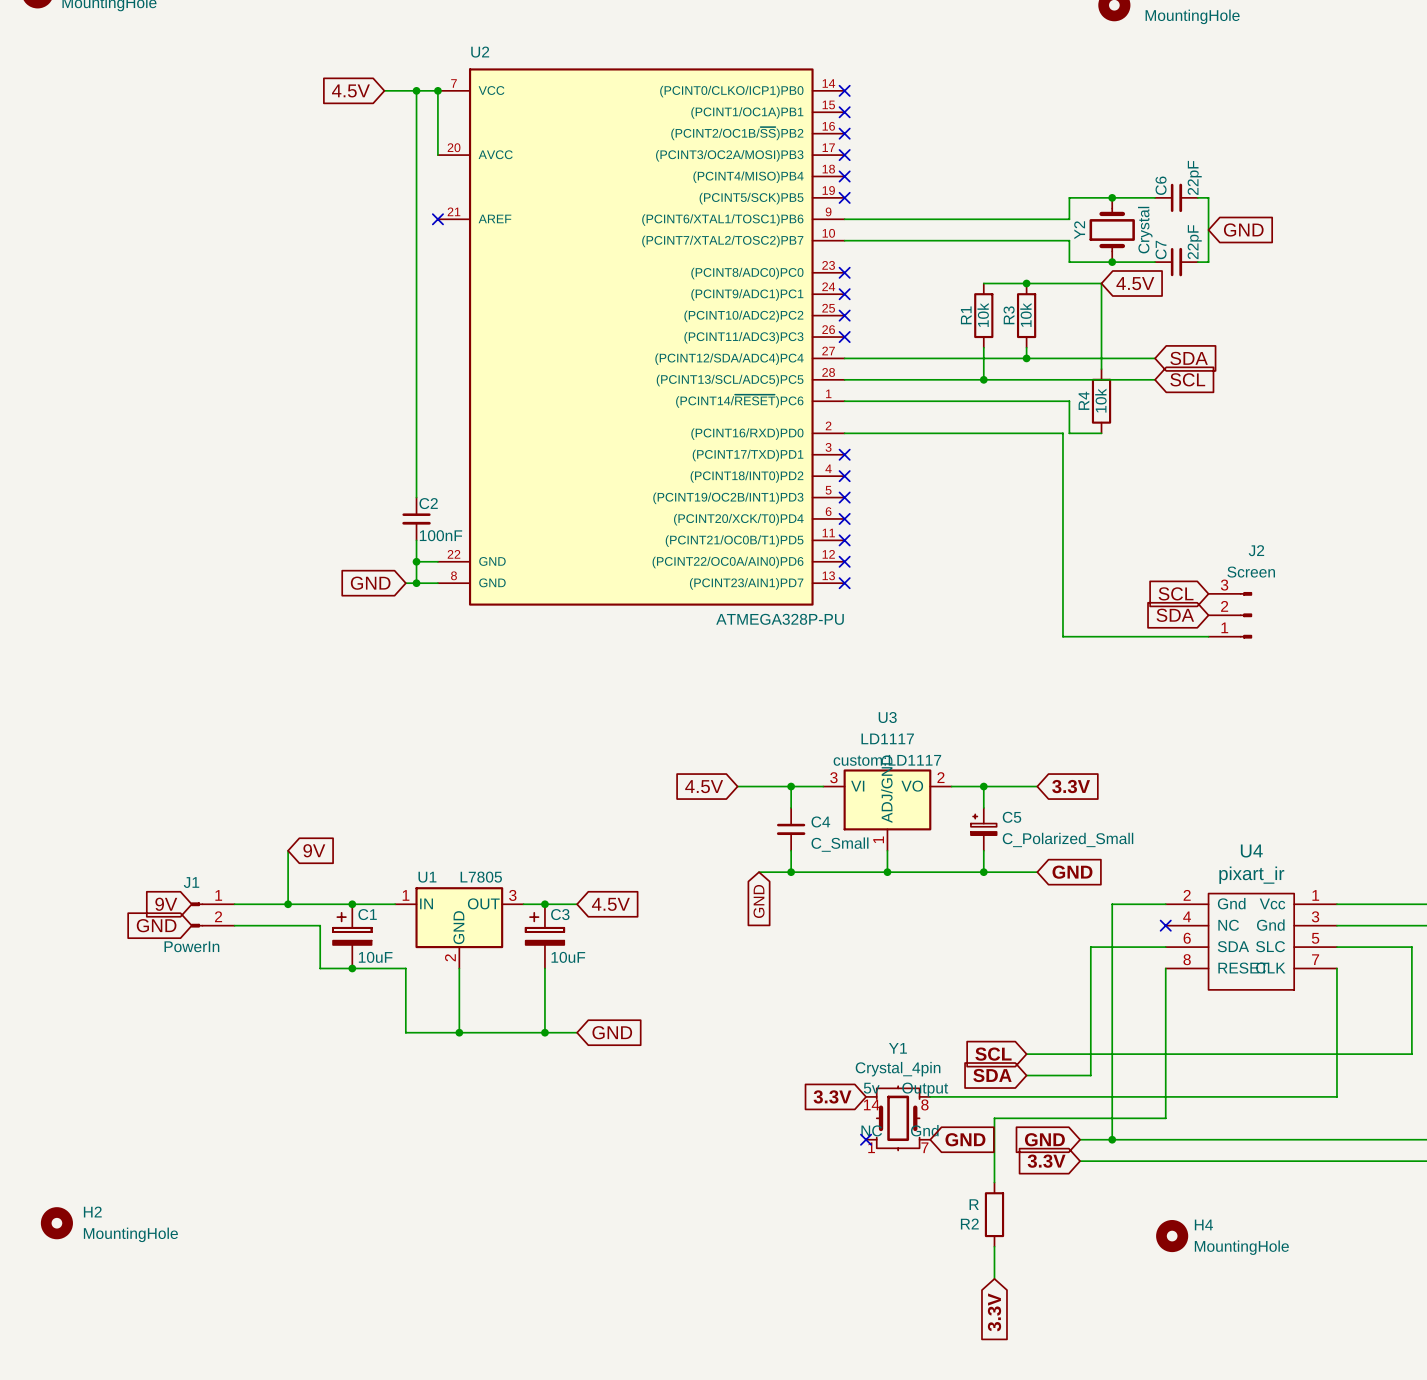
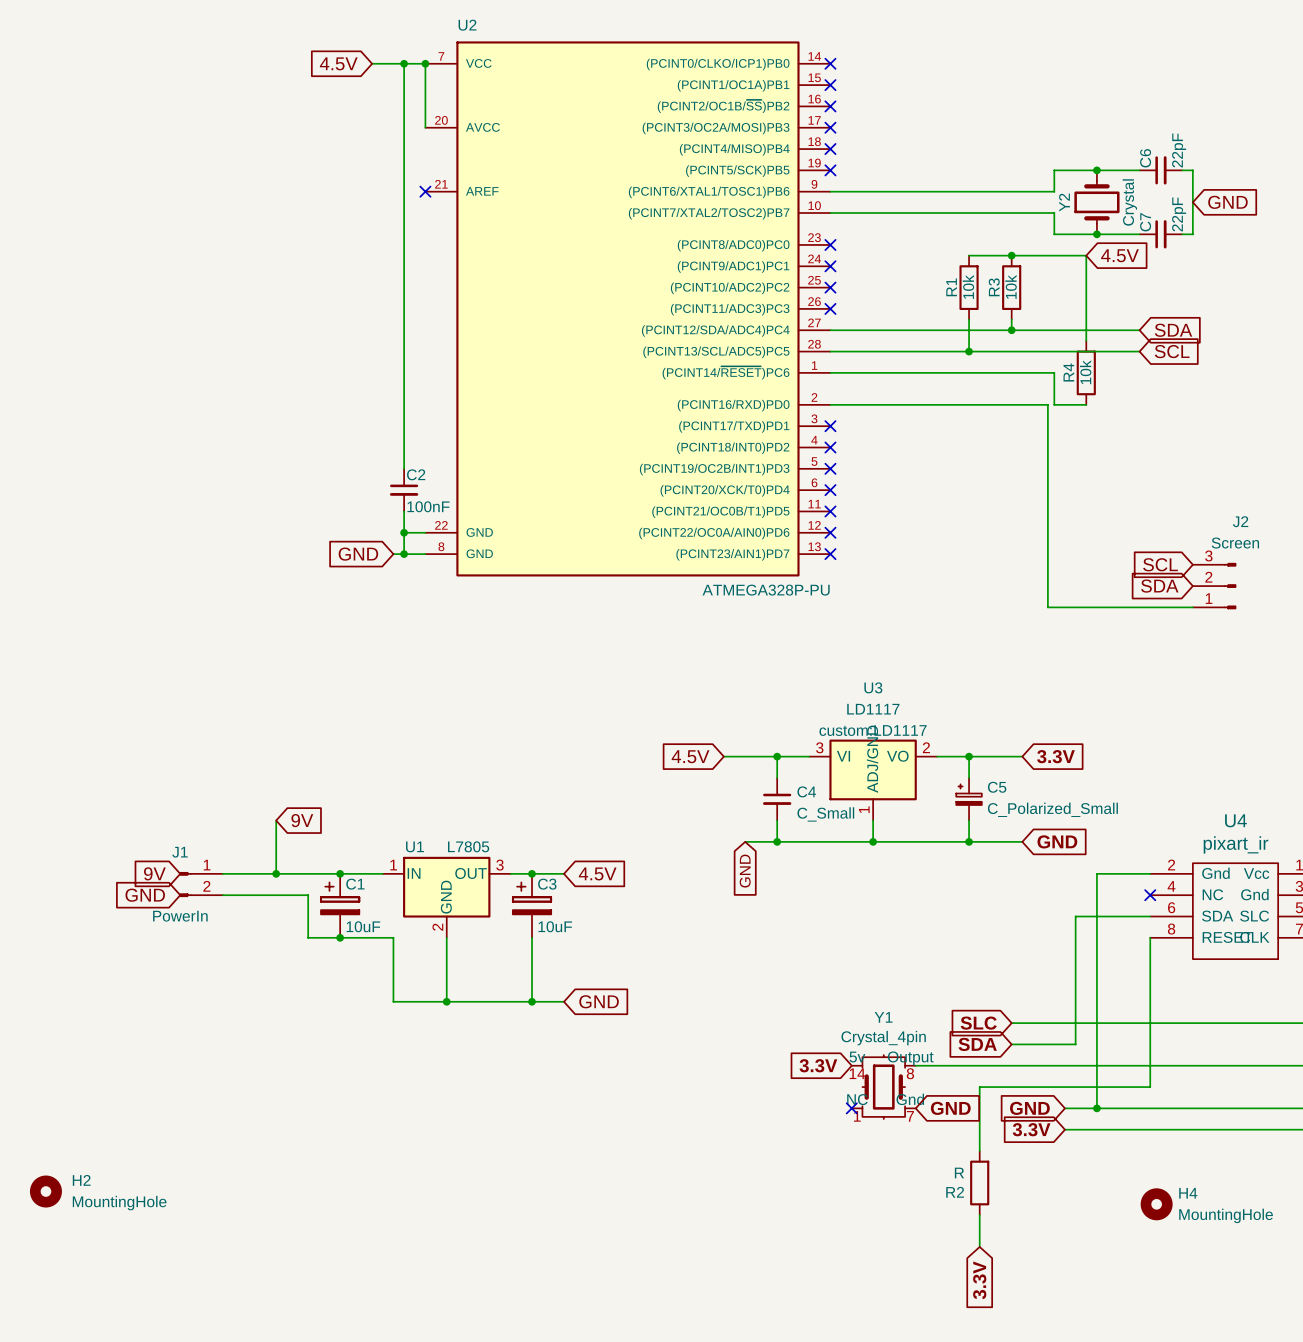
global label: SCL (993, 1054) -> SLC (978, 1023)

